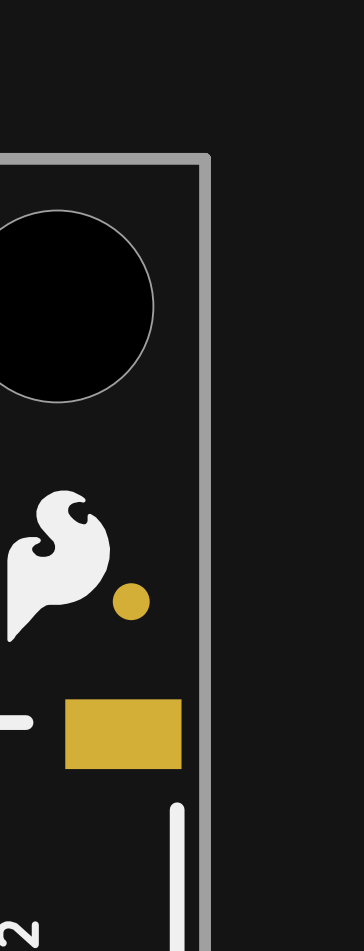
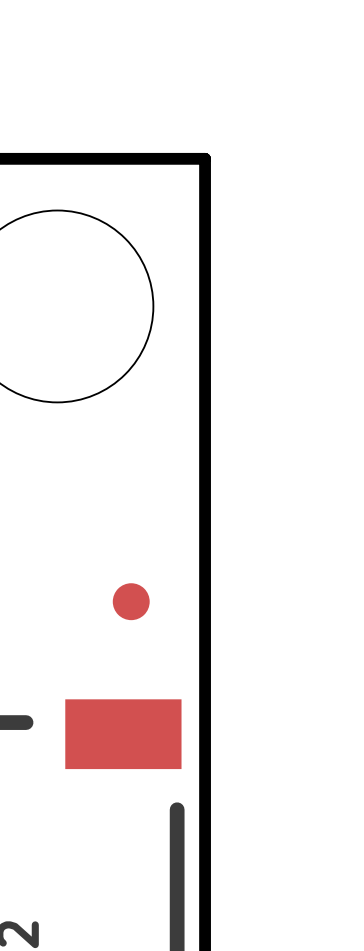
drawing: [7, 490, 111, 643] -> none

